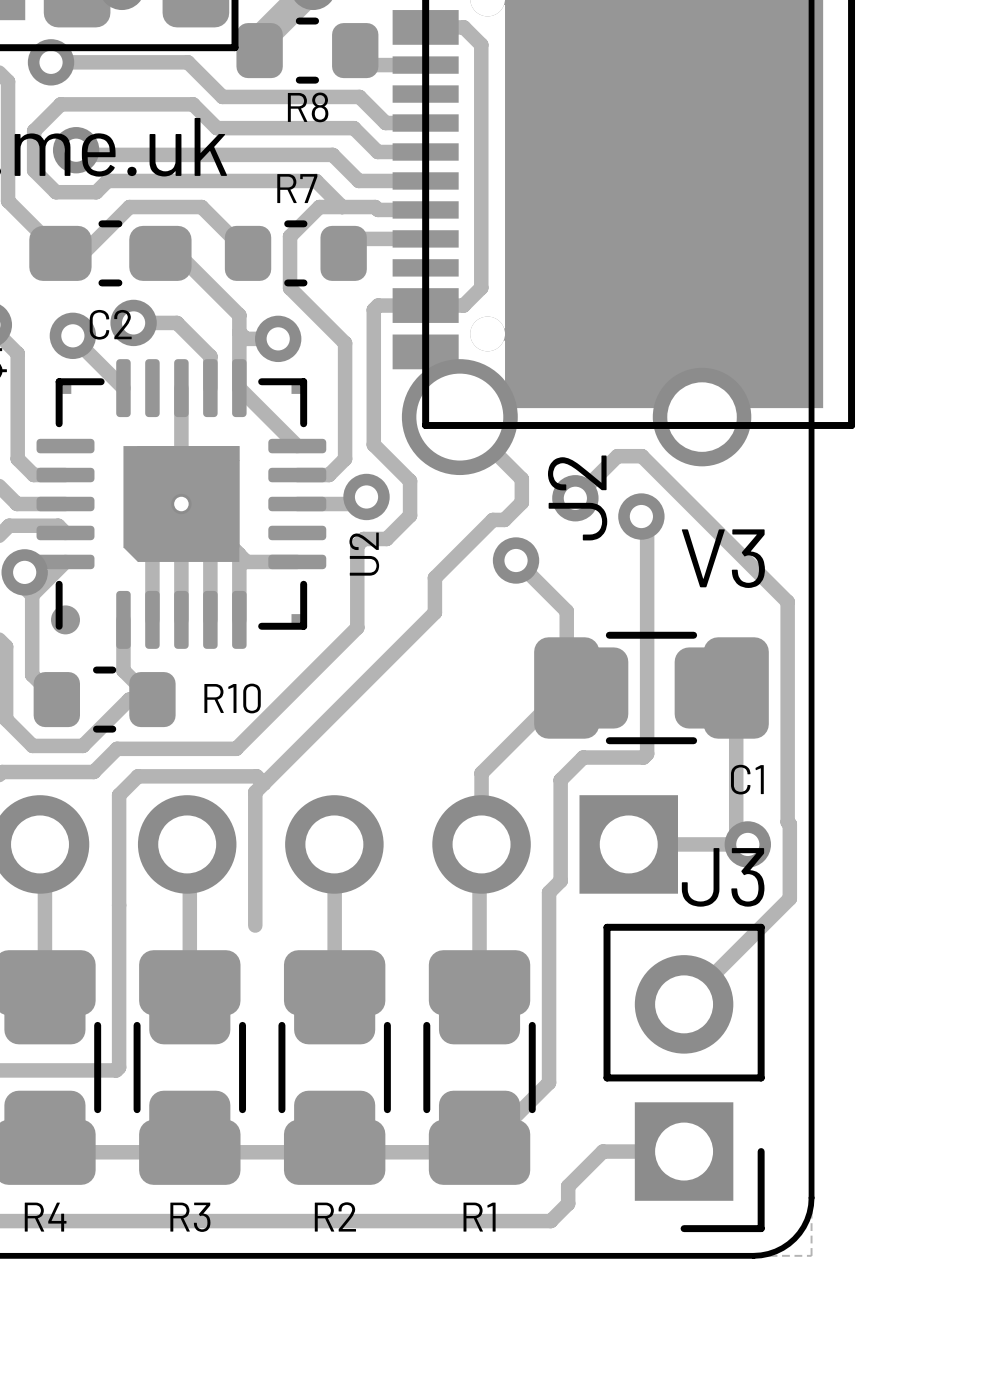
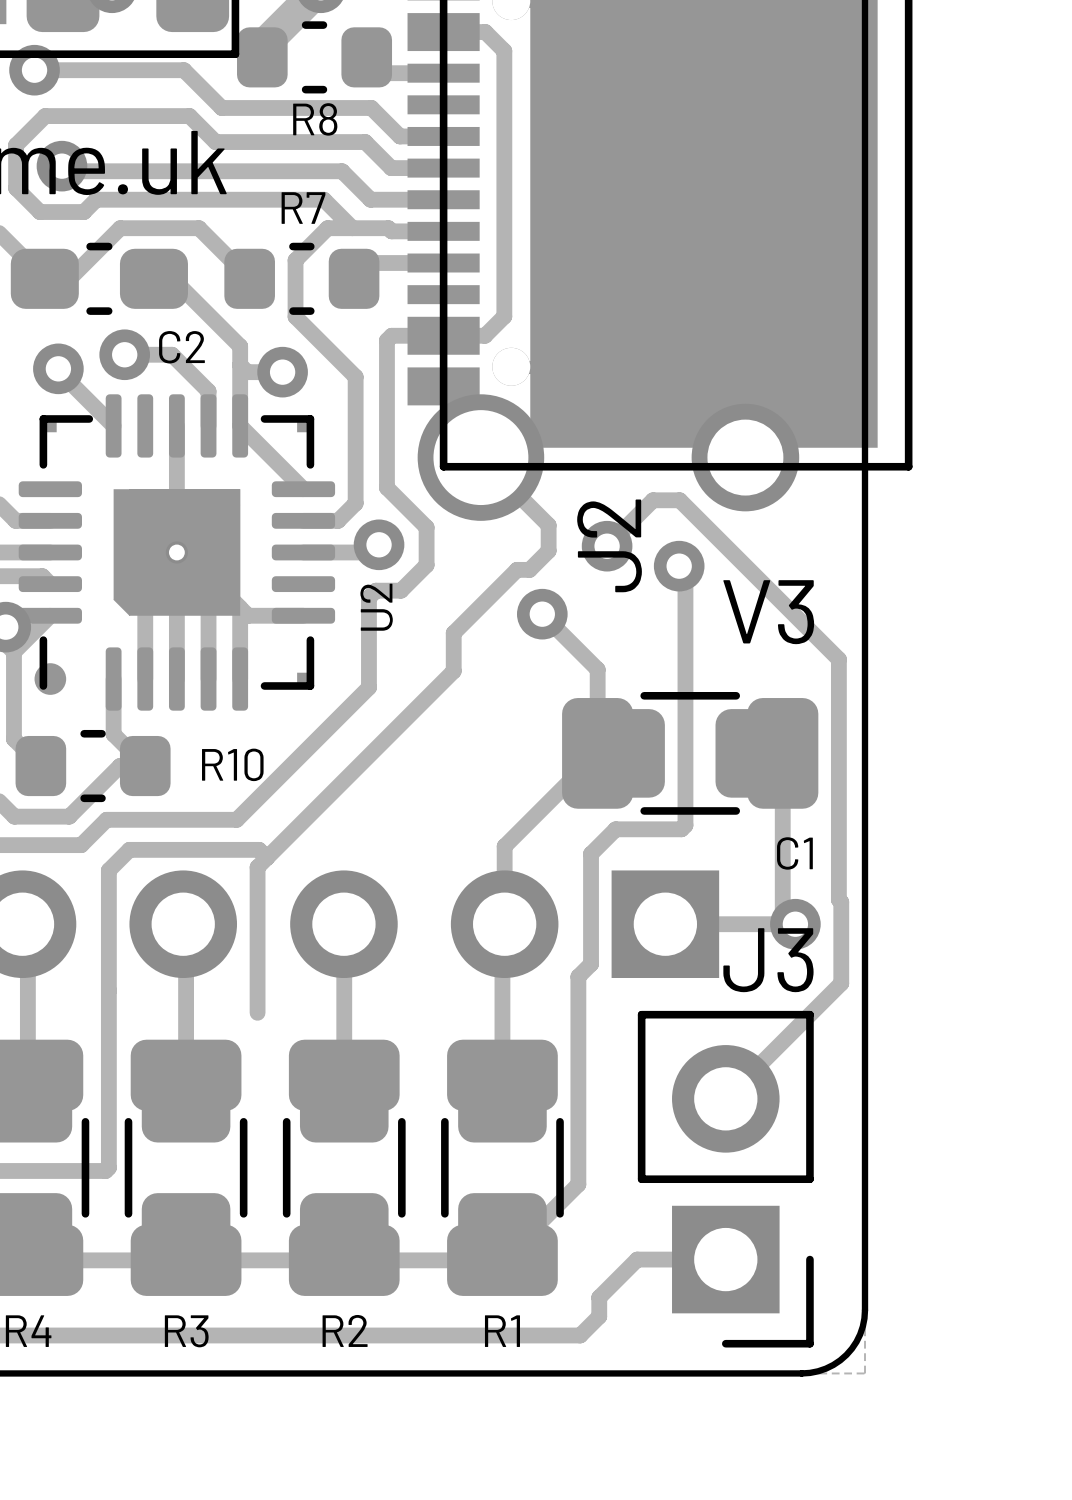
C2 name position: C2 (110, 324) -> C2 (181, 347)

